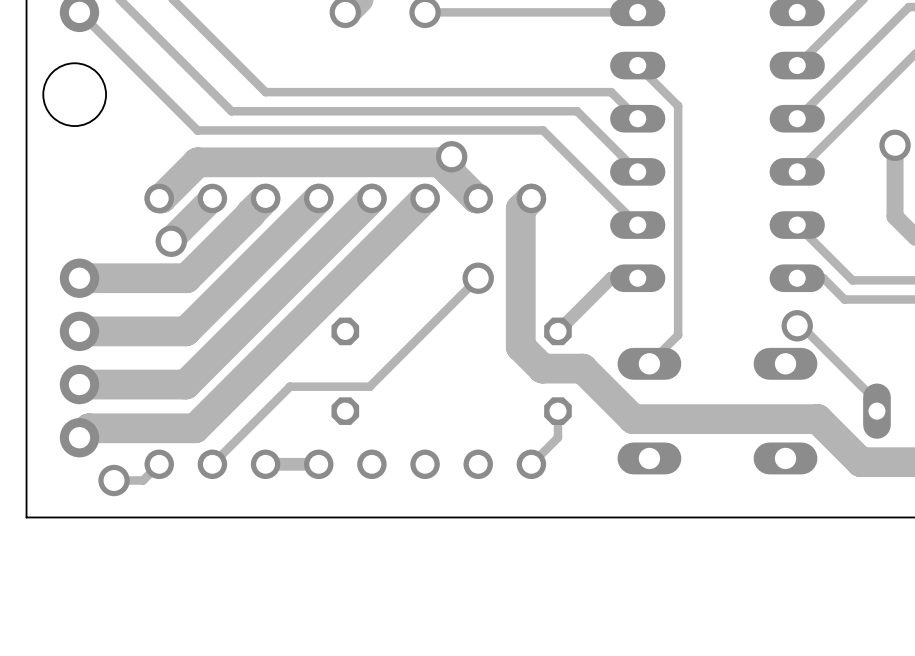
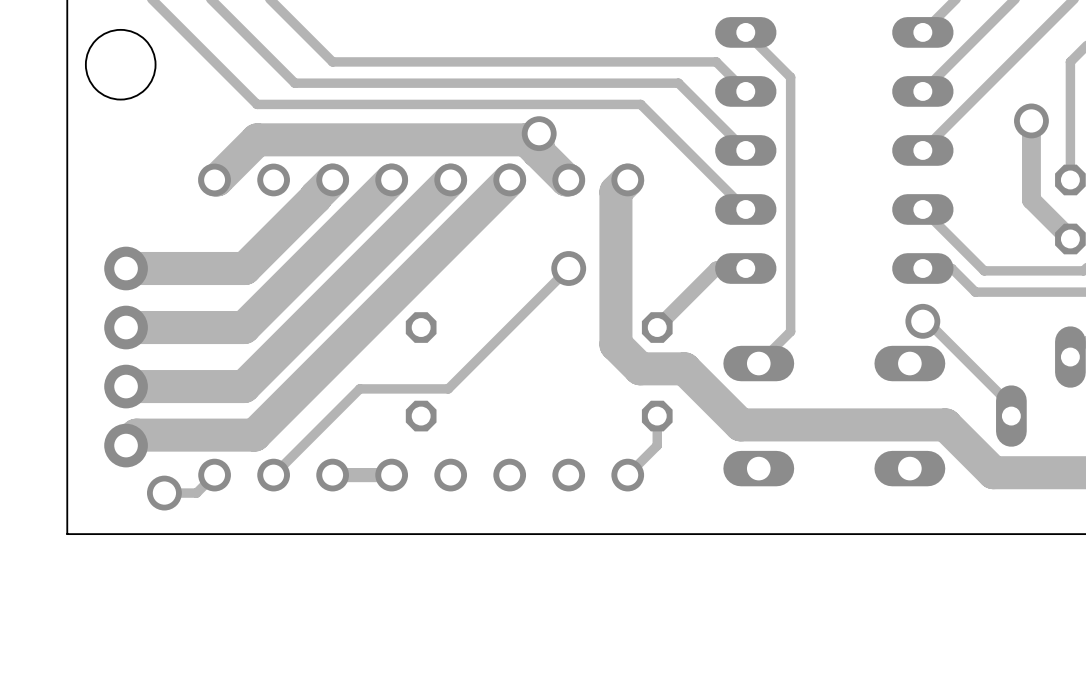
track: (212, 198) (171, 241) -> none
via: (171, 241) -> none

